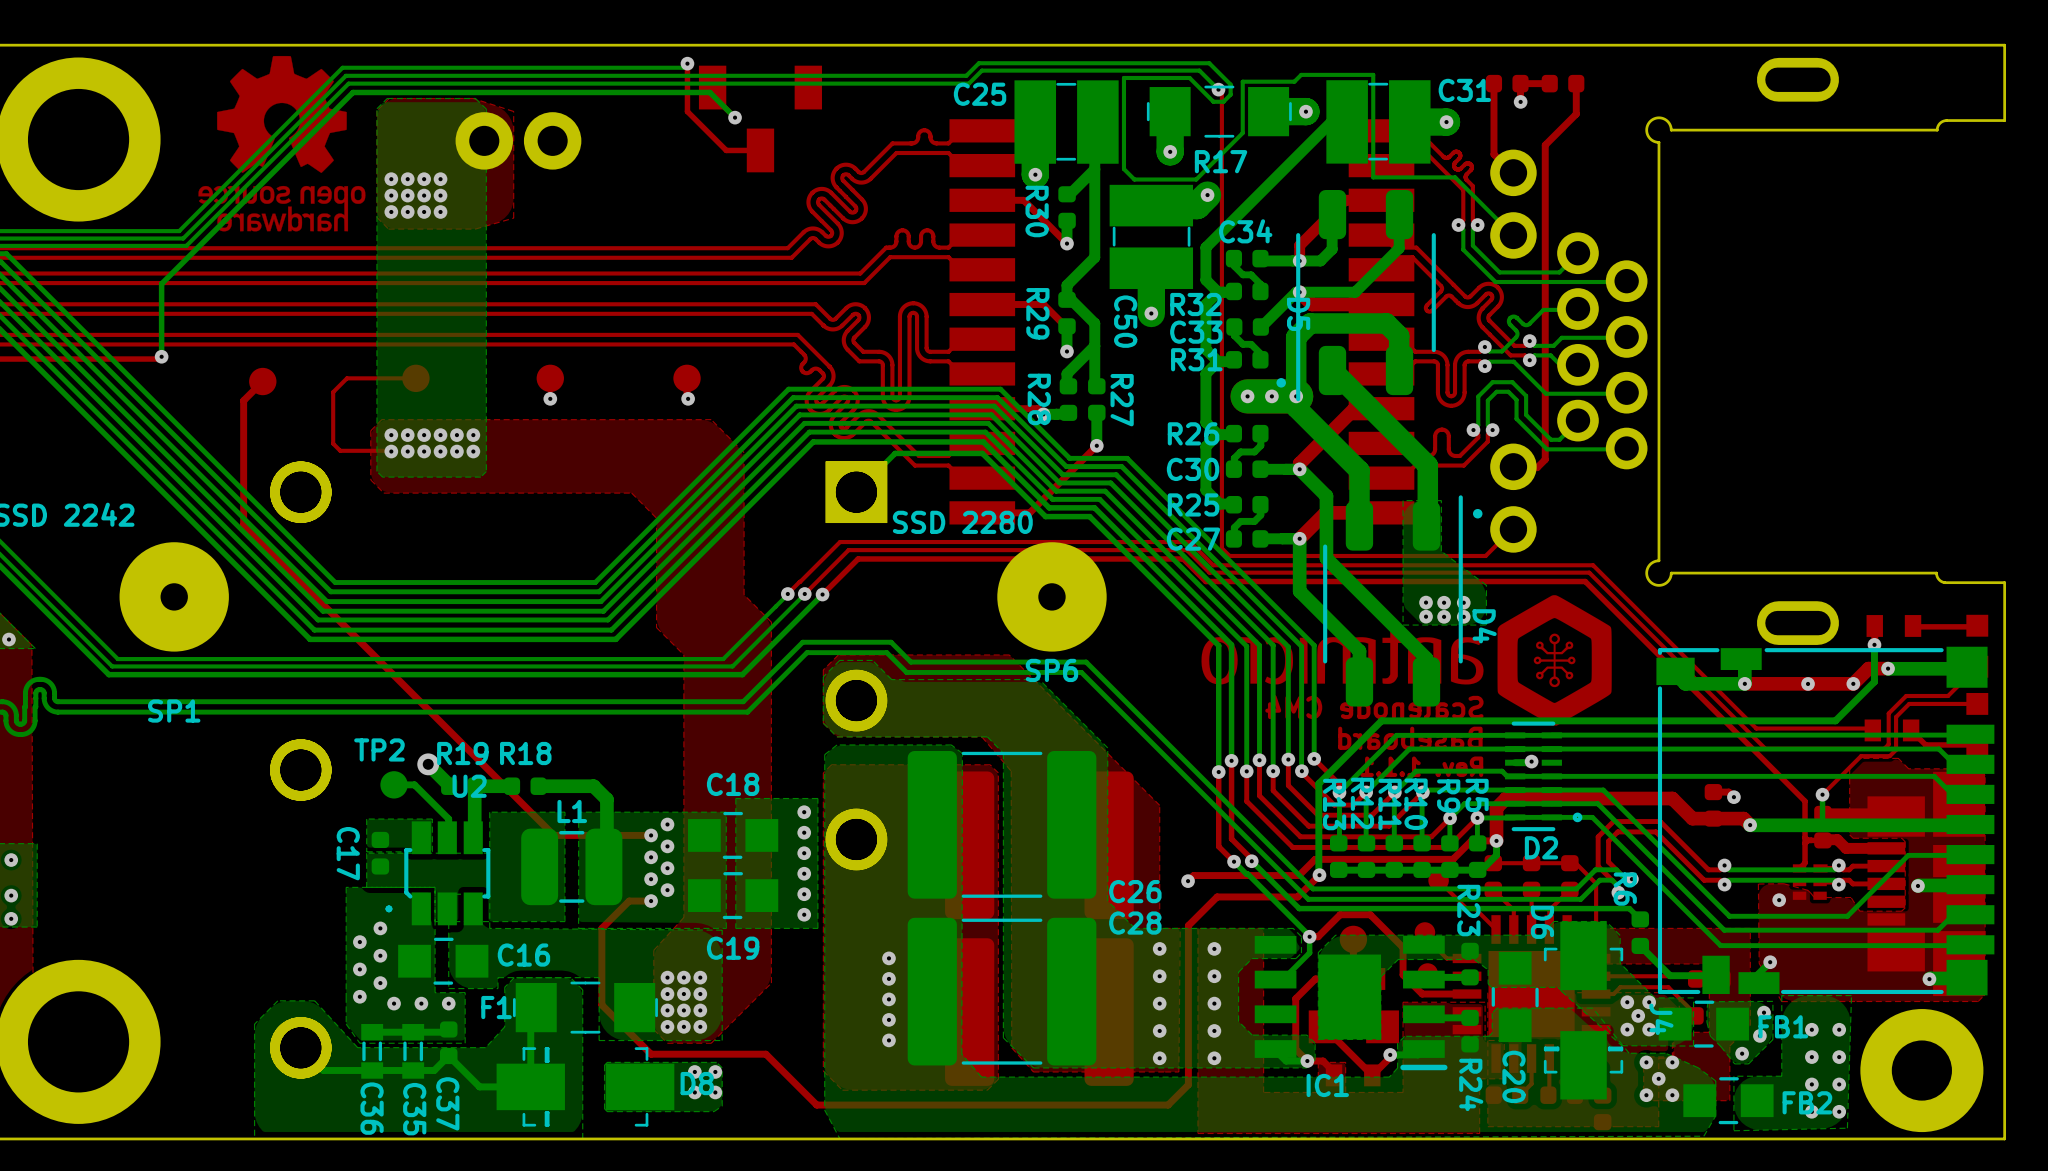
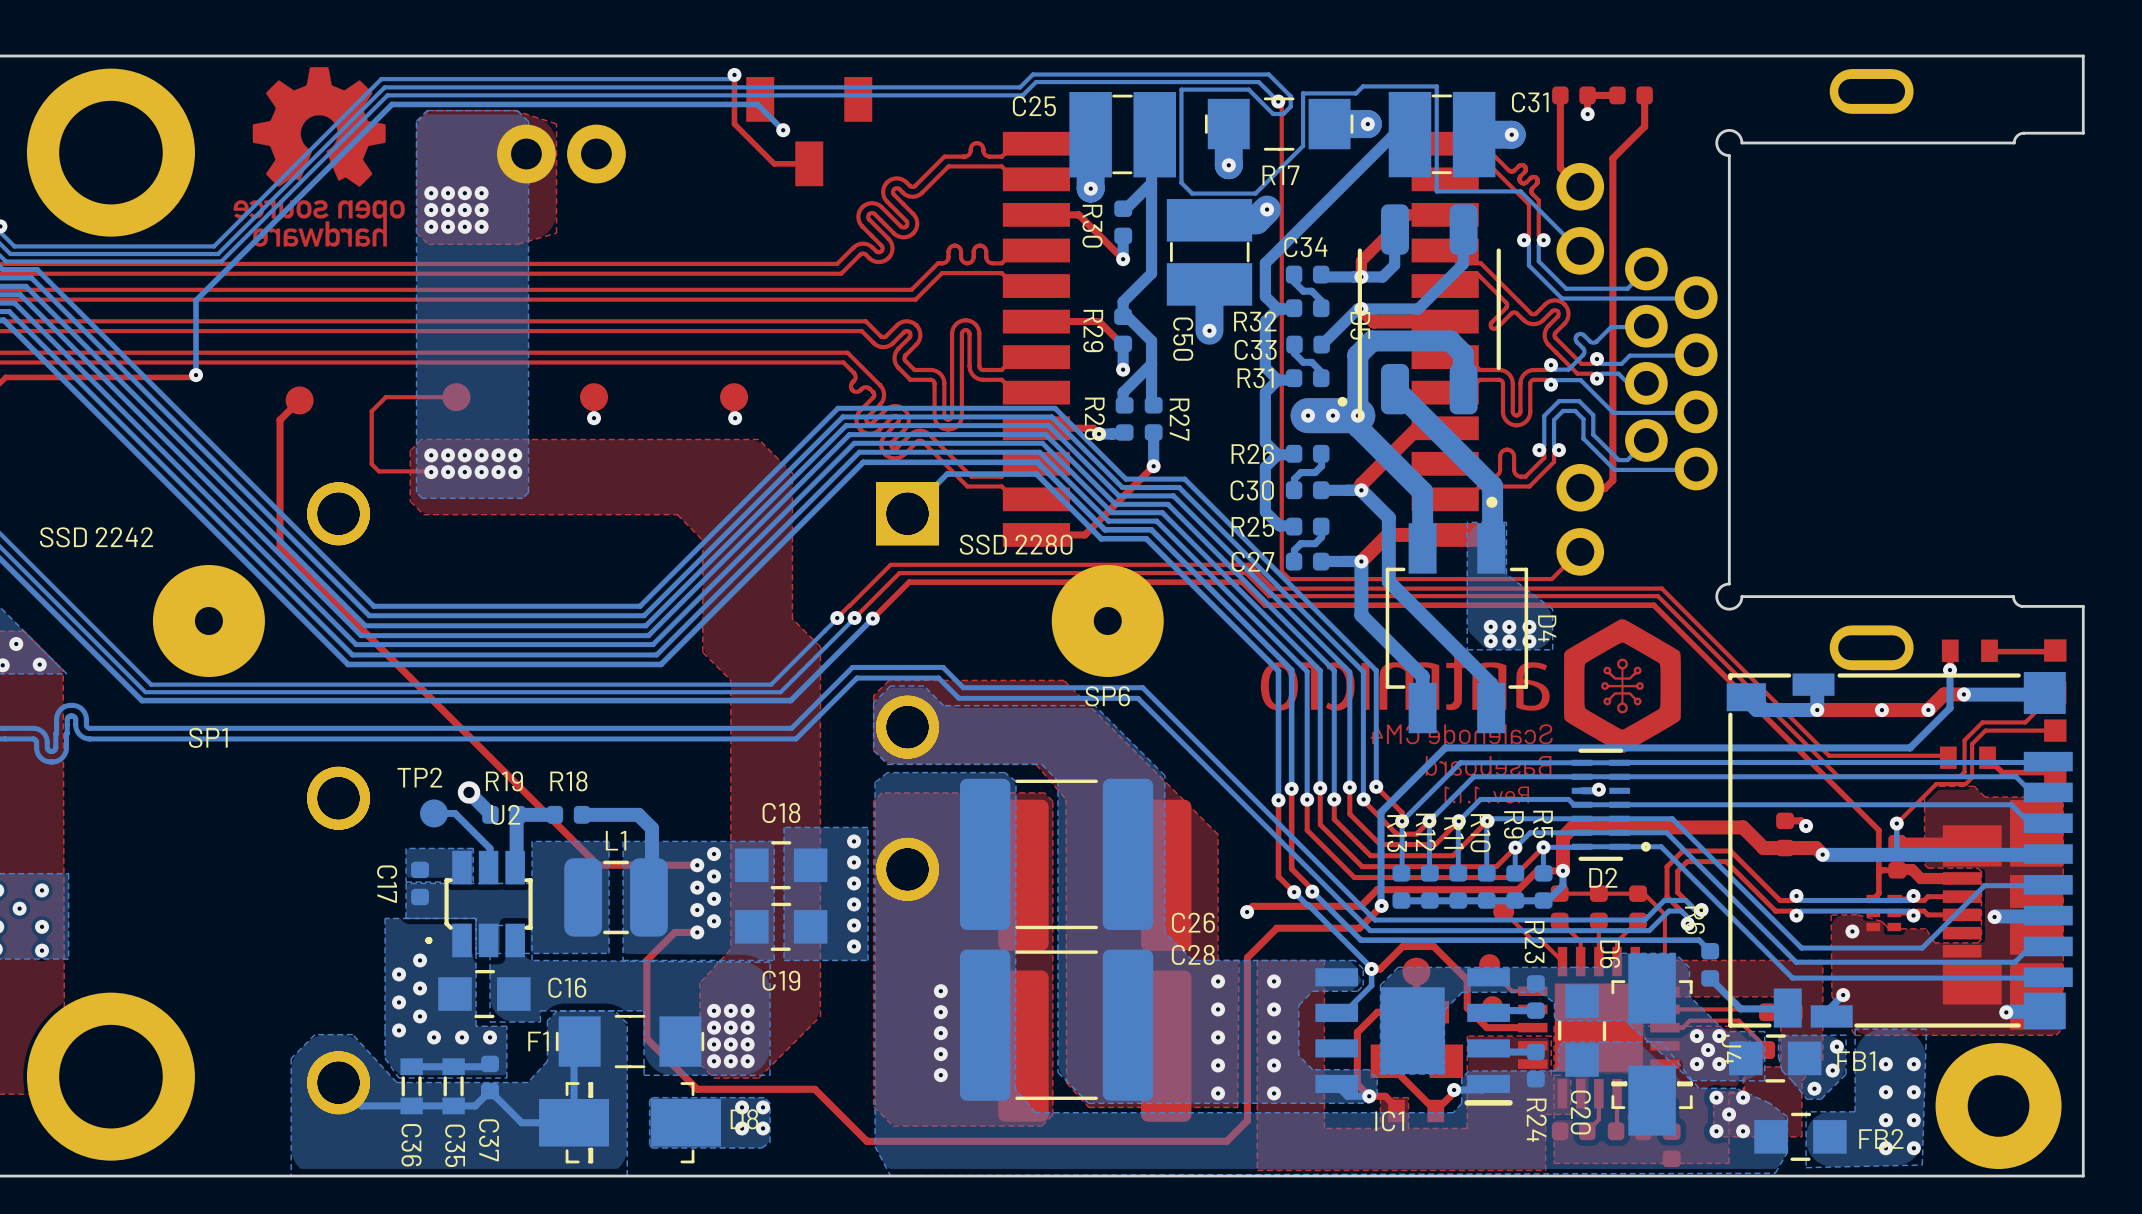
D4 footprint: [1323, 495, 1483, 707] -> [1385, 496, 1529, 734]

